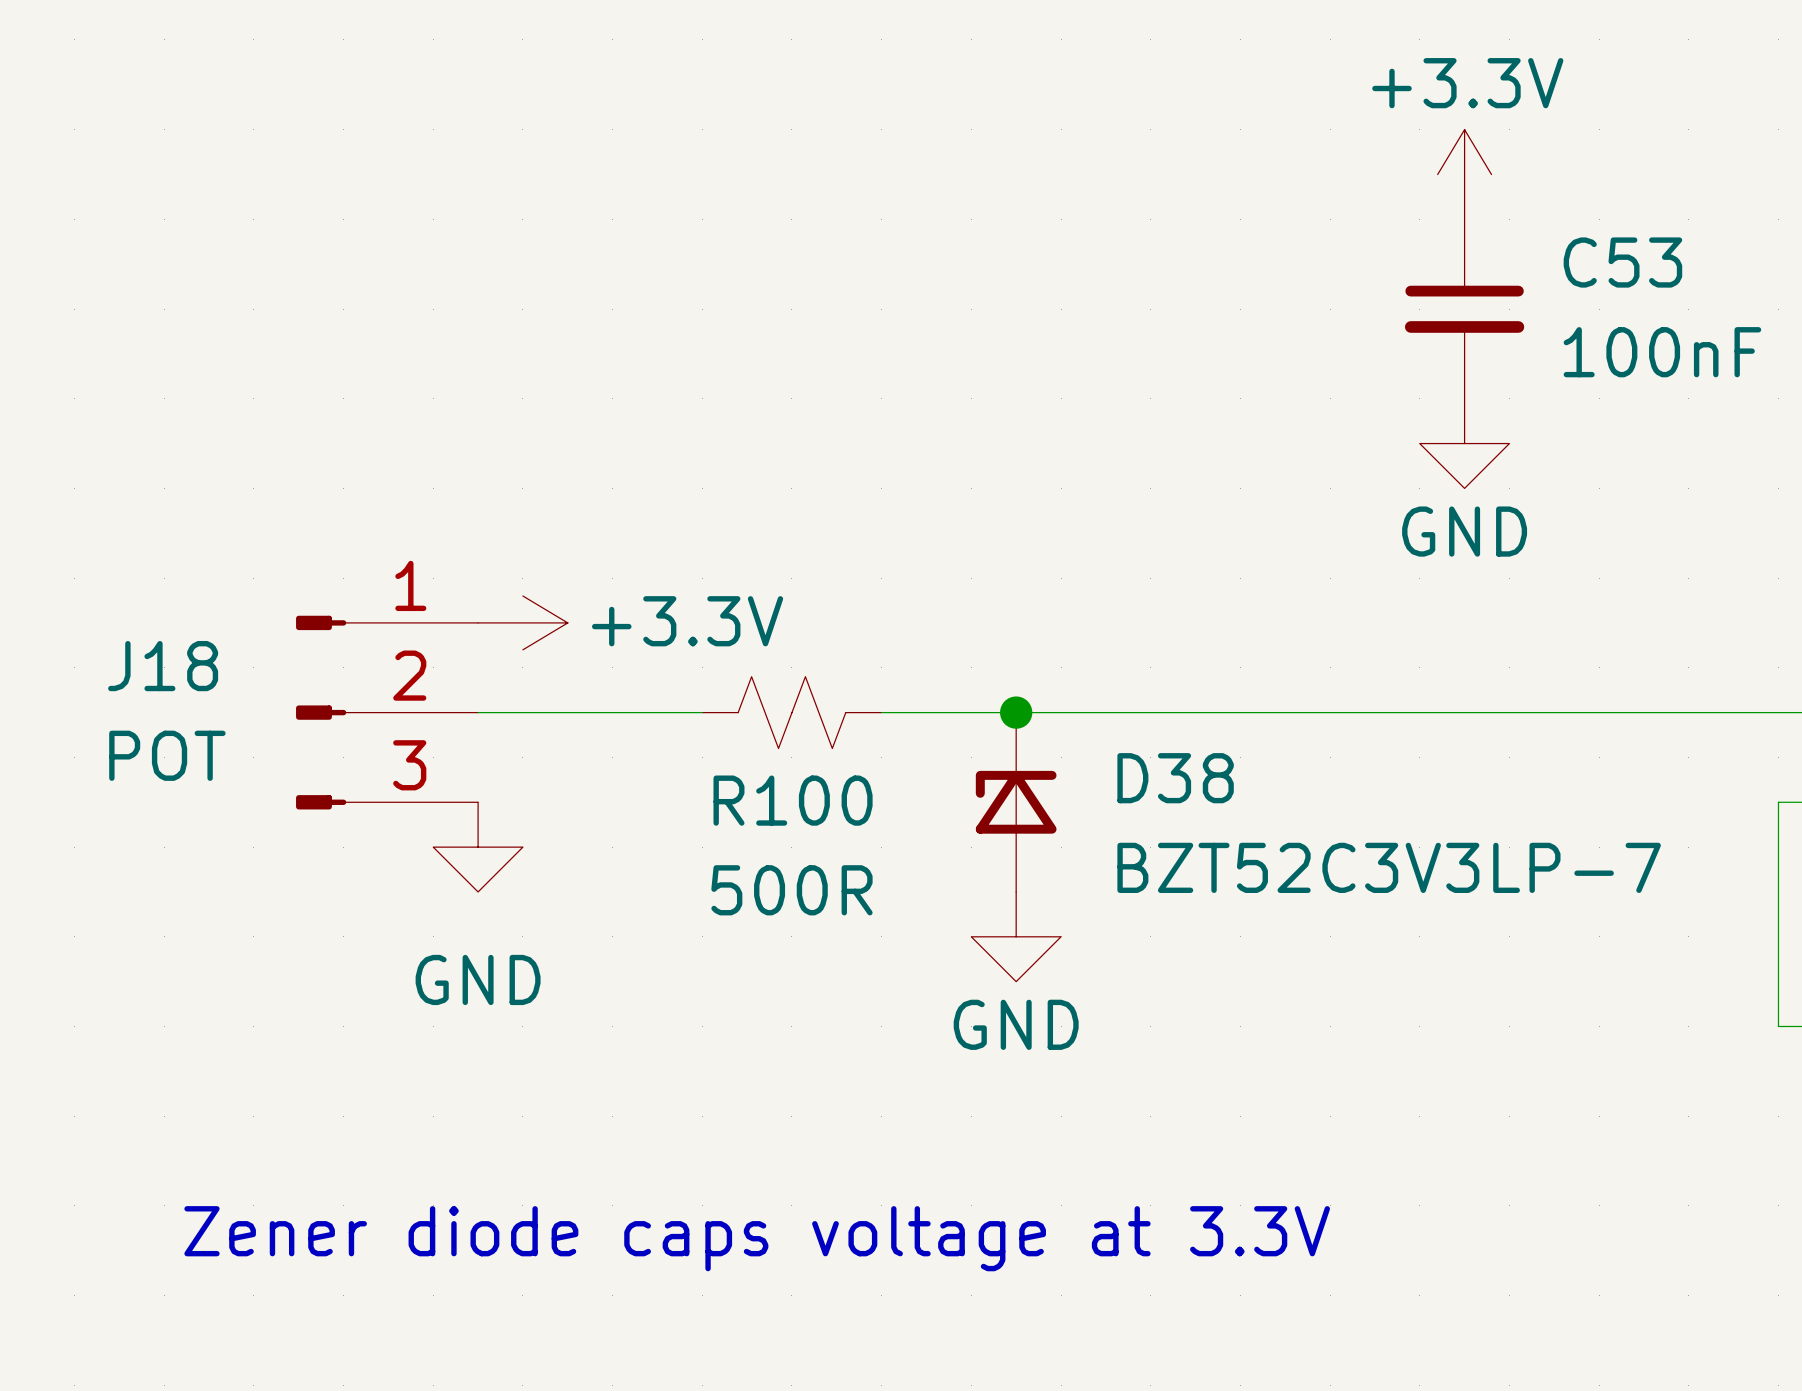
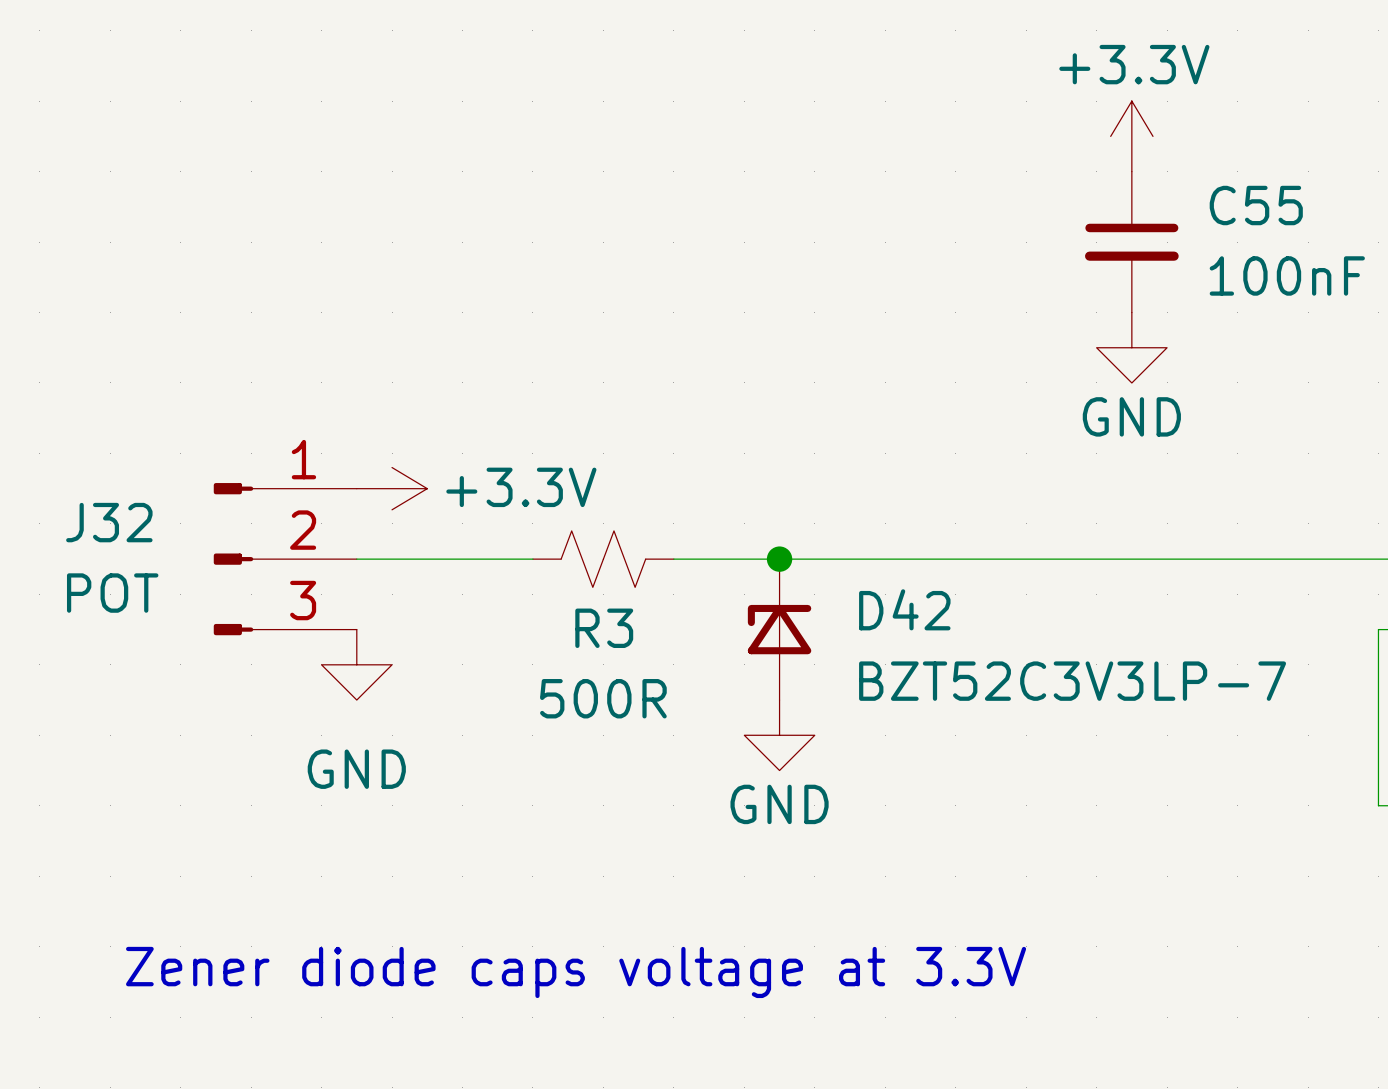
C53 name: C53 (1622, 262) -> C55 (1256, 205)
J18 name: J18 (163, 666) -> J32 (109, 522)
D38 name: D38 (1175, 778) -> D42 (904, 609)
R100 name: R100 (793, 800) -> R3 (604, 628)

